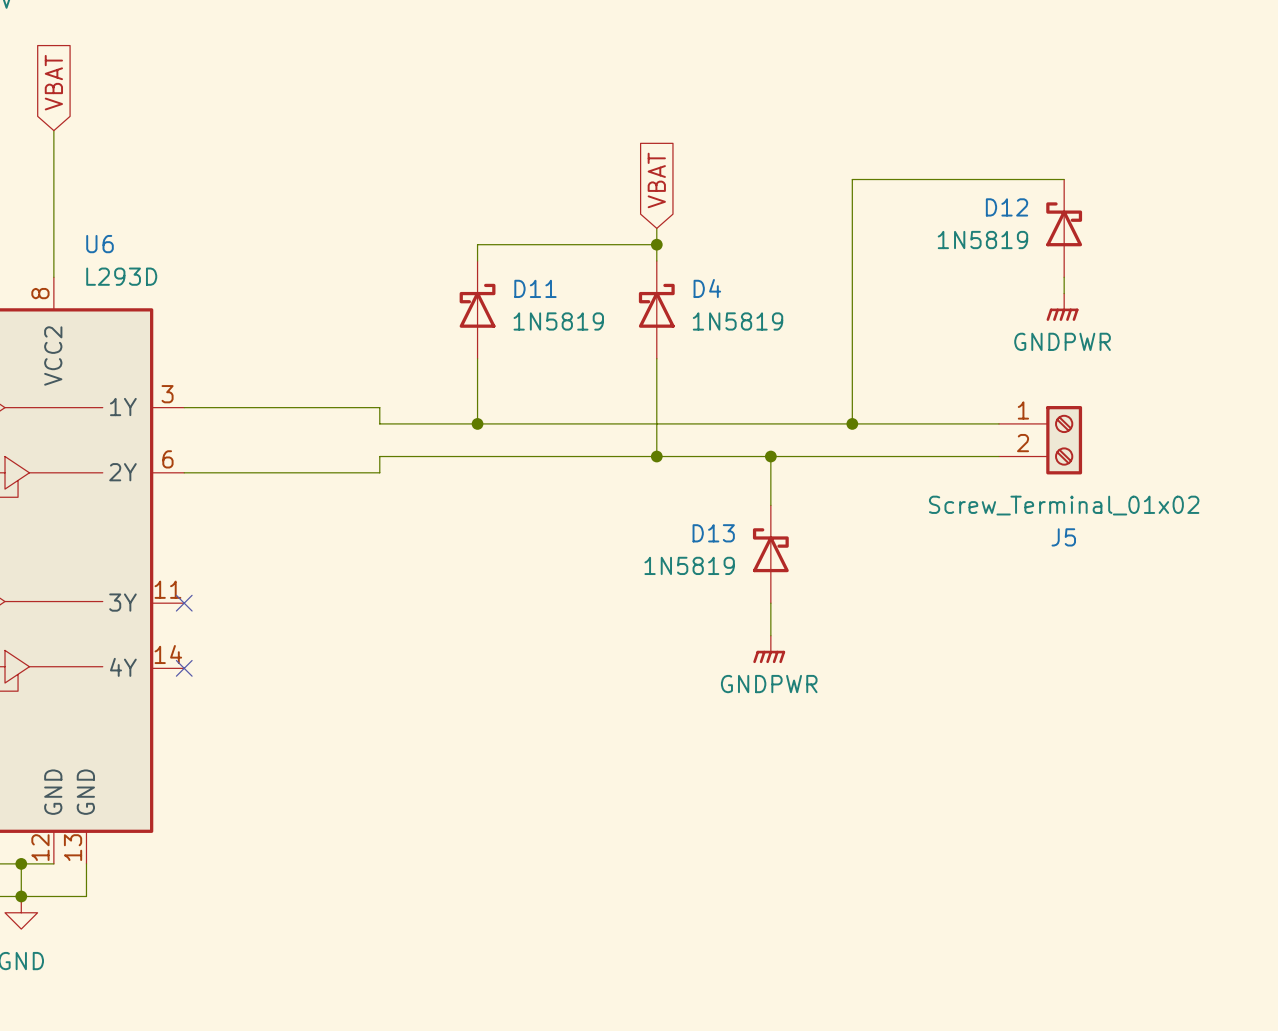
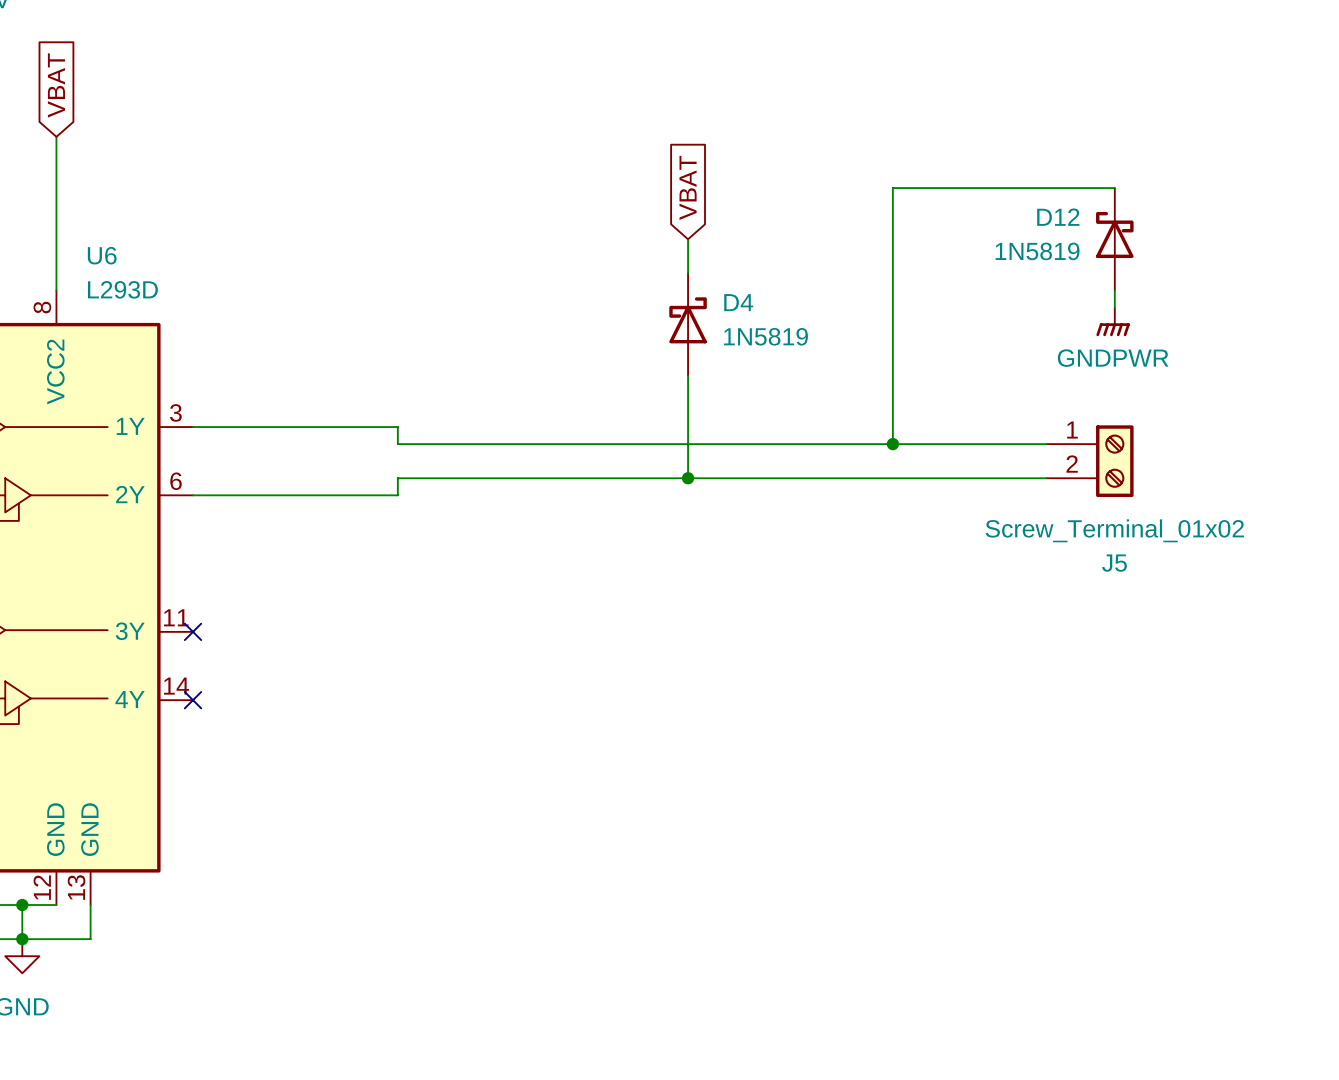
wire: (656, 244) (477, 244) (477, 260) -> none
junction: (656, 244) -> none
D11: 1N5819 (477, 309) -> none
wire: (477, 358) (477, 423) -> none
junction: (477, 423) -> none
wire: (770, 456) (770, 505) -> none
junction: (770, 456) -> none
D13: 1N5819 (770, 554) -> none
wire: (770, 603) (770, 635) -> none
power symbol: GNDPWR (769, 649) -> none

